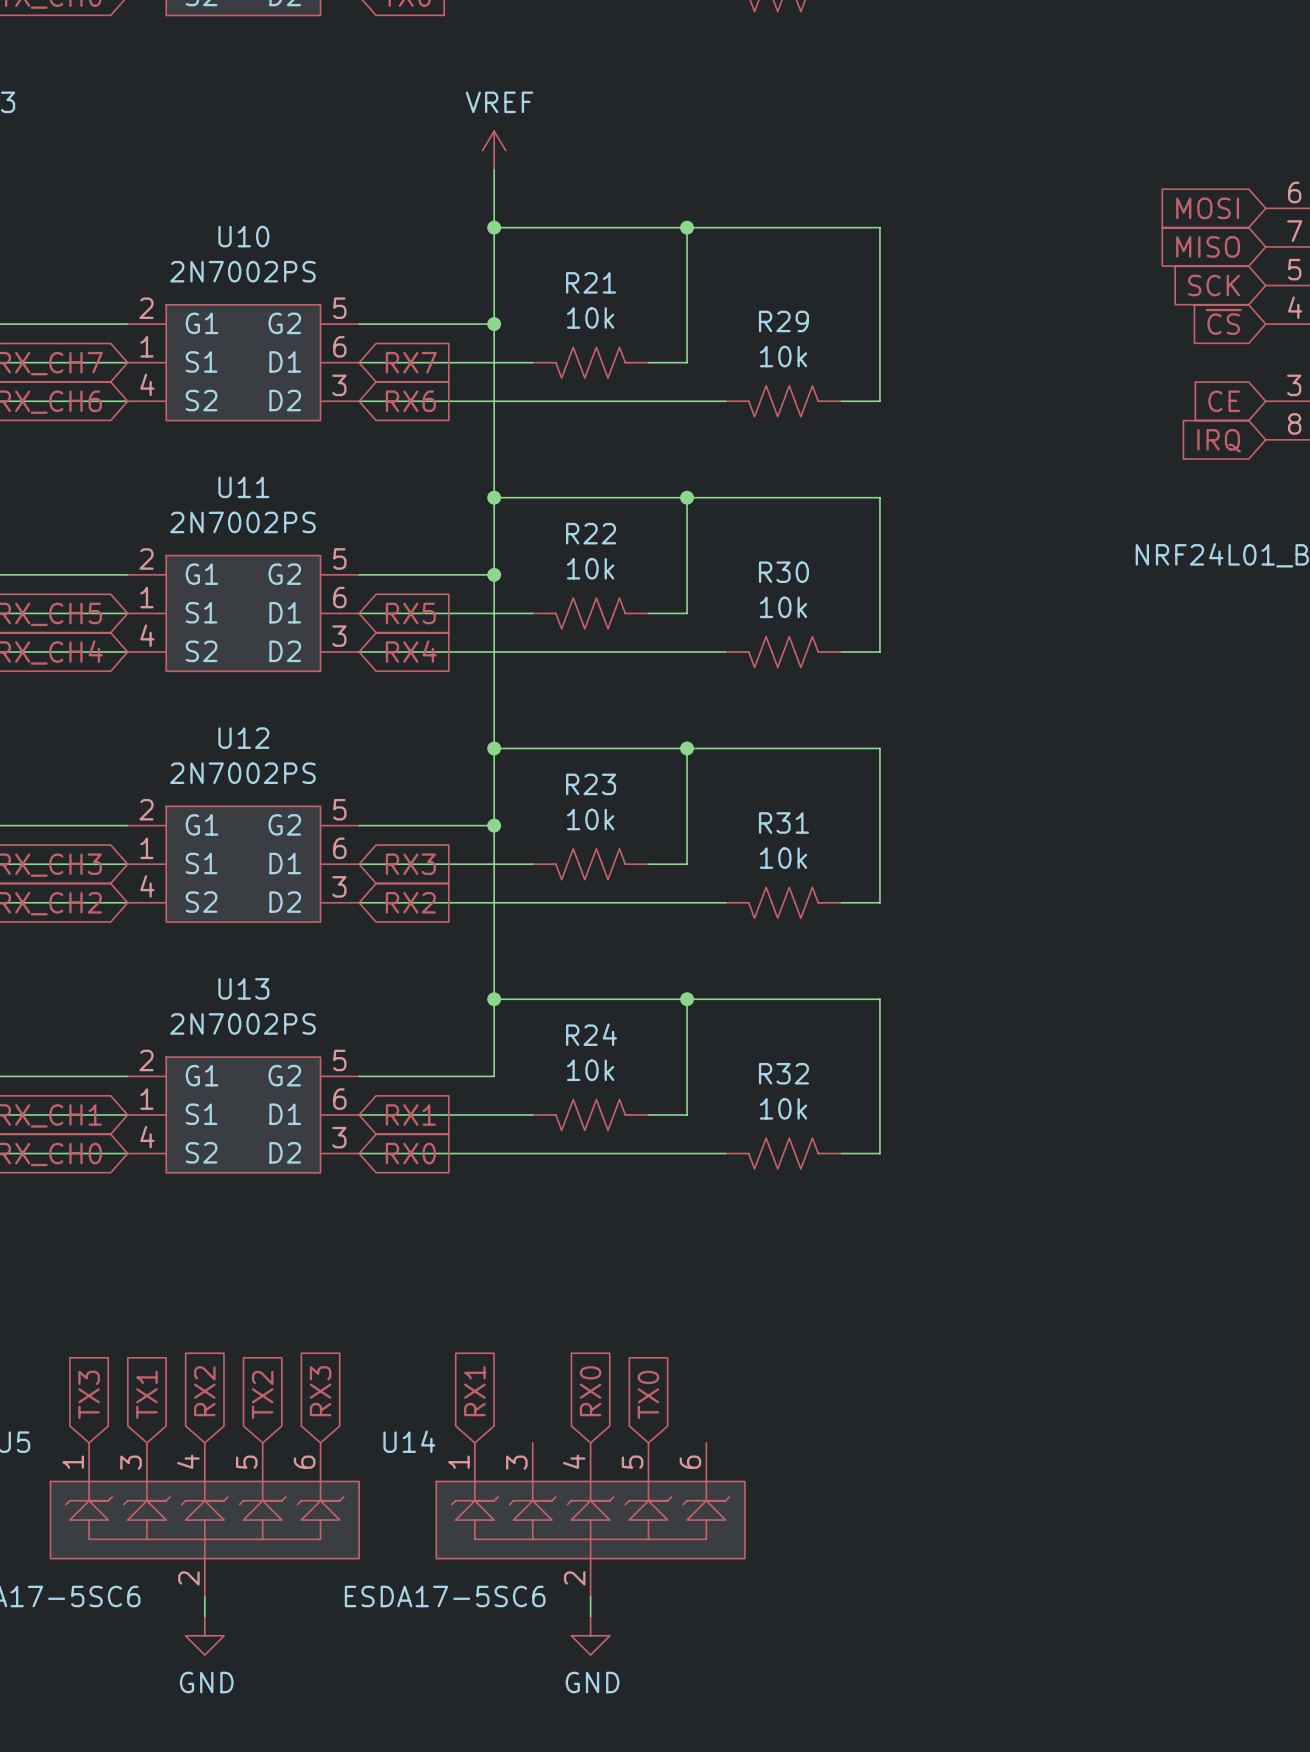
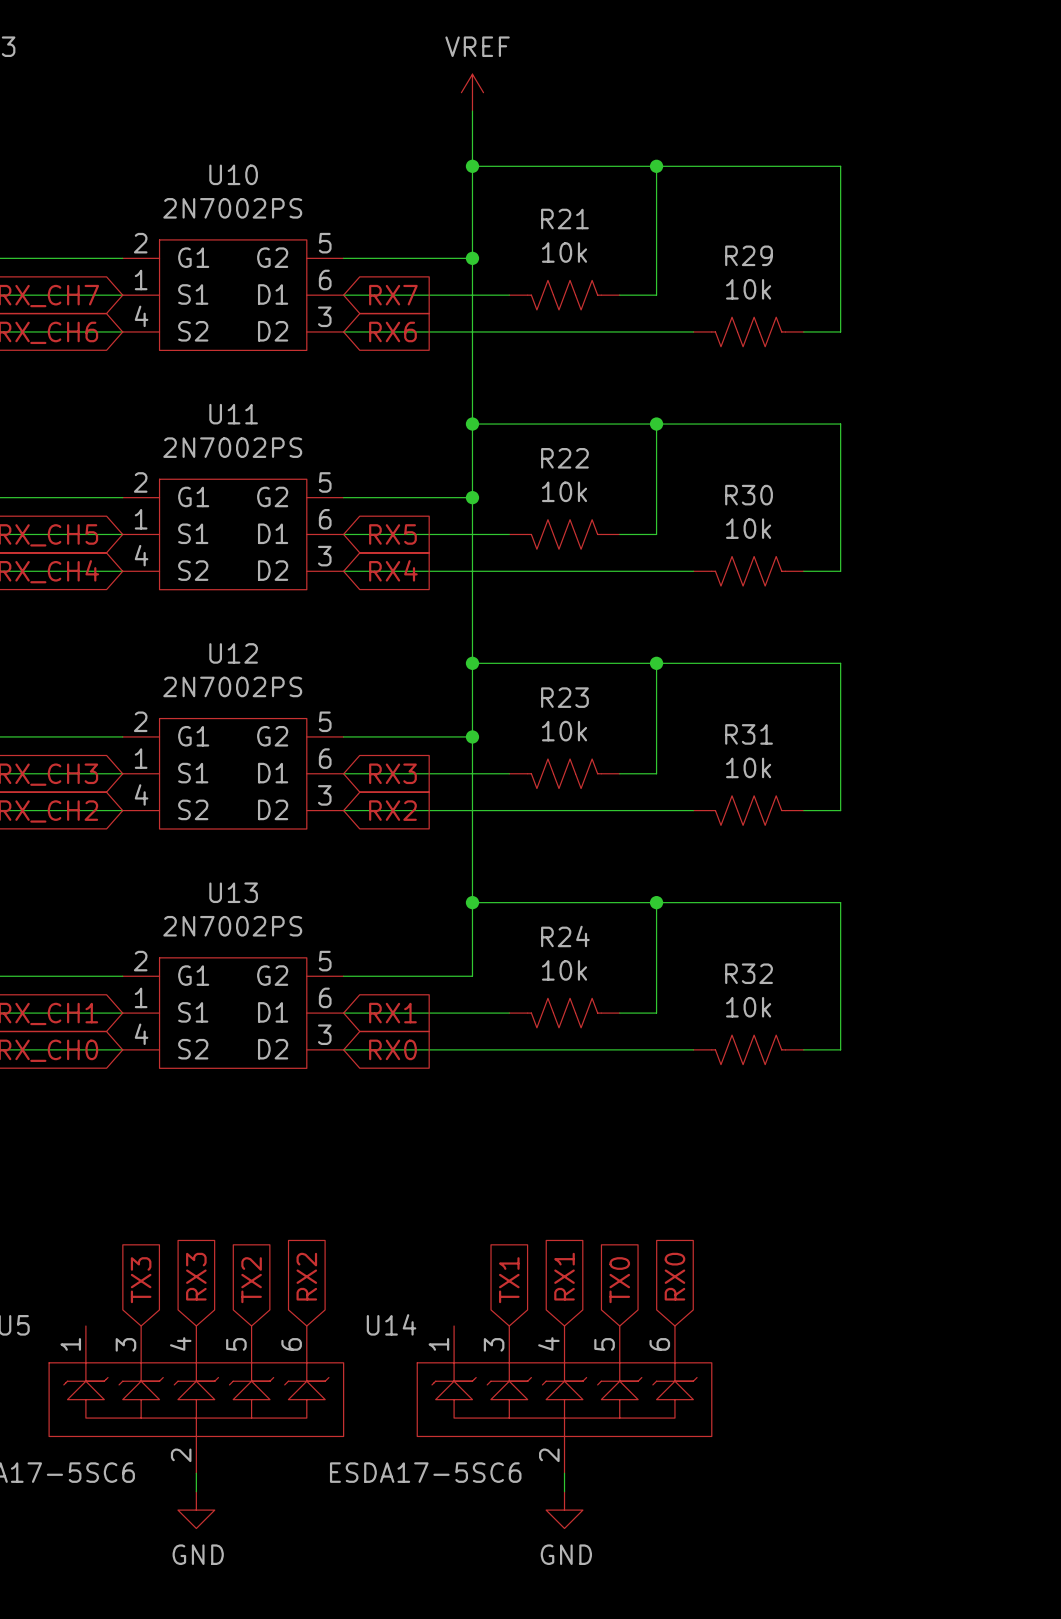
global label: RX2 (204, 1391) -> RX3 (196, 1276)
global label: RX3 (320, 1391) -> RX2 (306, 1276)
global label: RX1 (474, 1391) -> none
global label: RX0 (590, 1391) -> RX1 (564, 1276)
global label: none -> RX0 (674, 1276)
global label: TX3 (89, 1394) -> none
global label: TX1 (146, 1394) -> TX3 (141, 1280)
global label: none -> TX1 (509, 1280)

